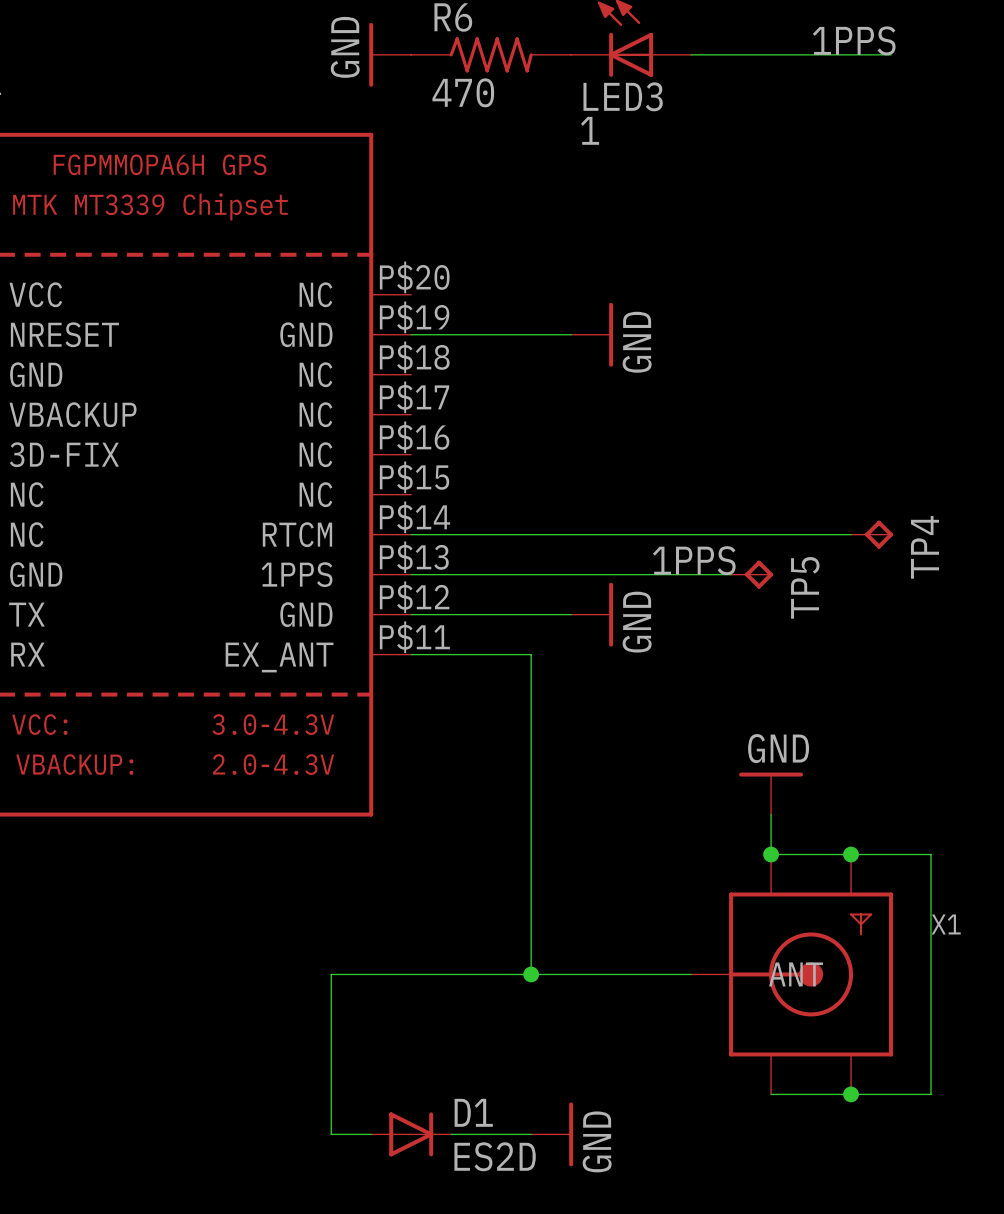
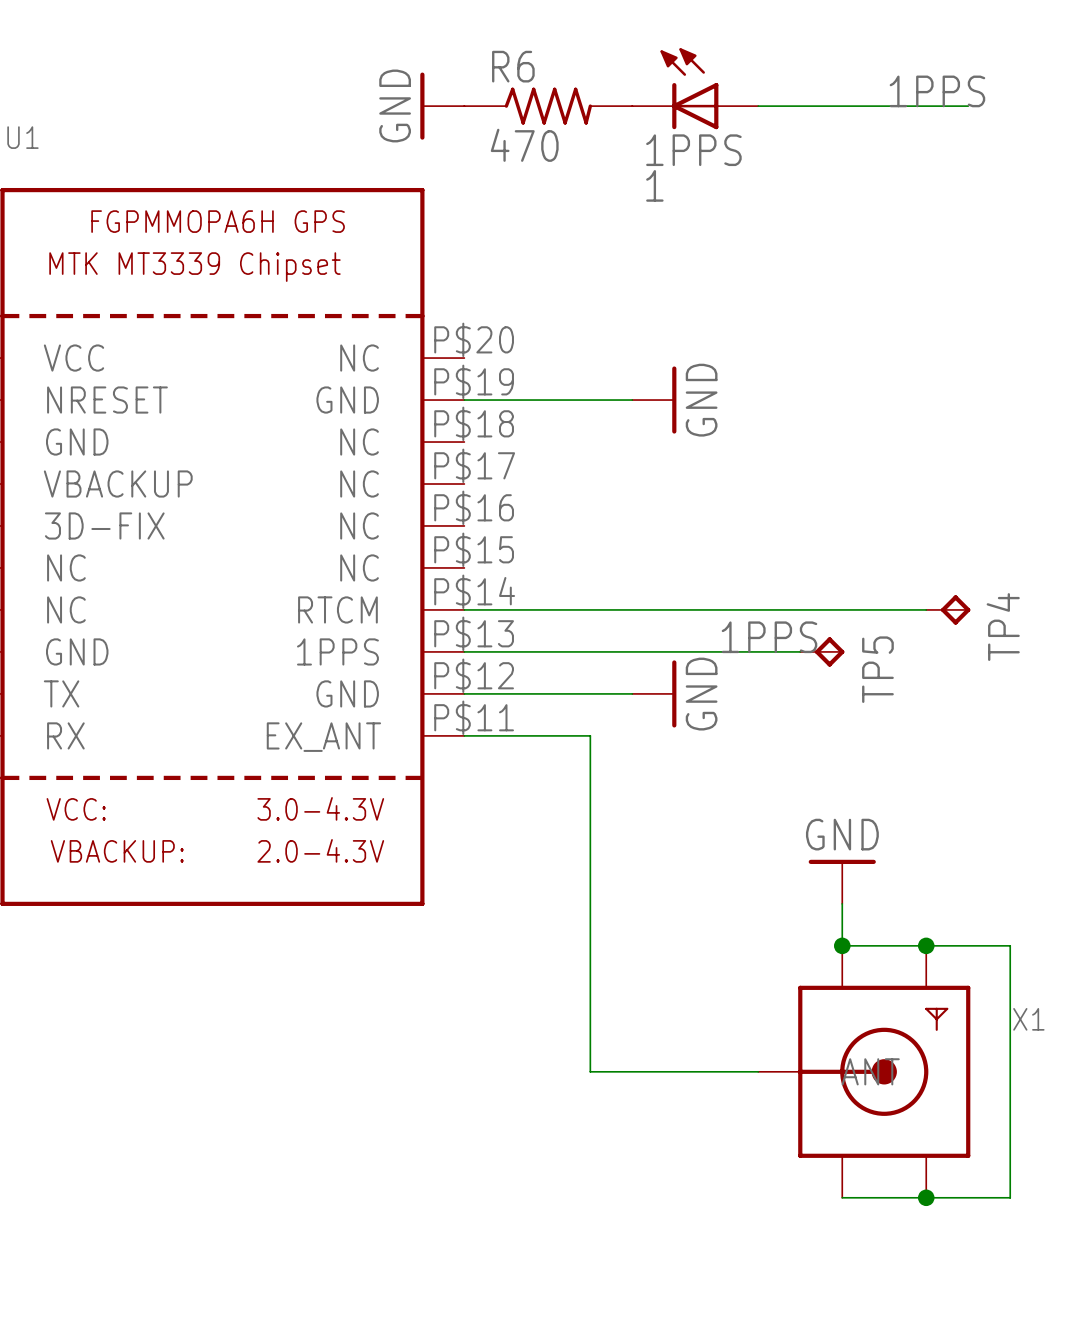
LED3 name: LED3 (623, 96) -> 1PPS (693, 150)
wire: (531, 974) (331, 974) (331, 1134) (371, 1134) -> none
junction: (531, 974) -> none
D1: ES2D (411, 1134) -> none
wire: (451, 1134) (531, 1134) -> none
power symbol: GND (552, 1134) -> none

